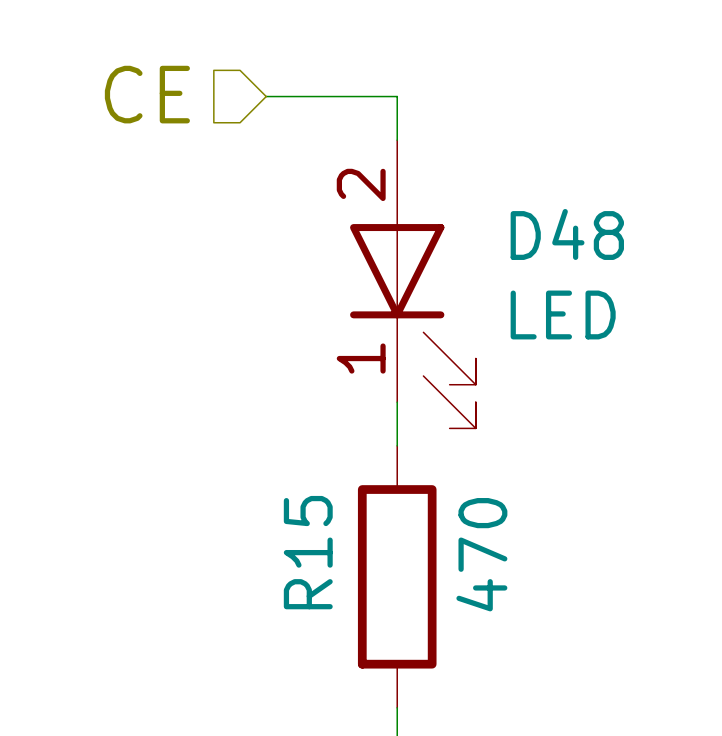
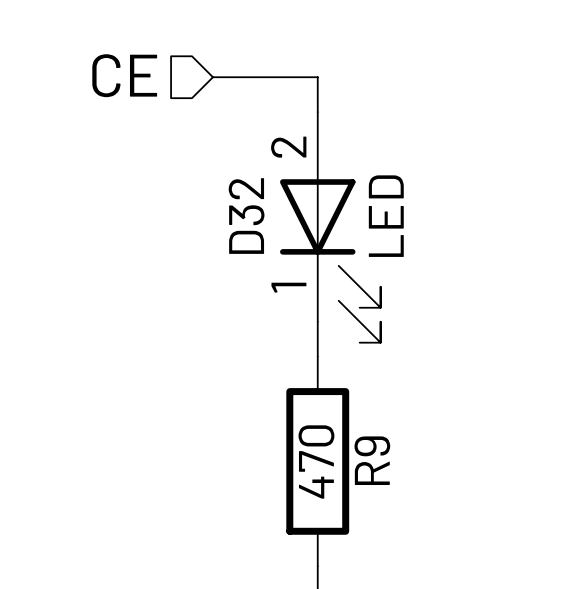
D48 name: D48 (567, 234) -> D32 (246, 216)
D48 value rotation: 0° (563, 314) -> 90° counterclockwise (386, 216)
R15 name: R15 (308, 552) -> R9 (372, 460)
R15 value position: 470 (481, 554) -> 470 (316, 461)

